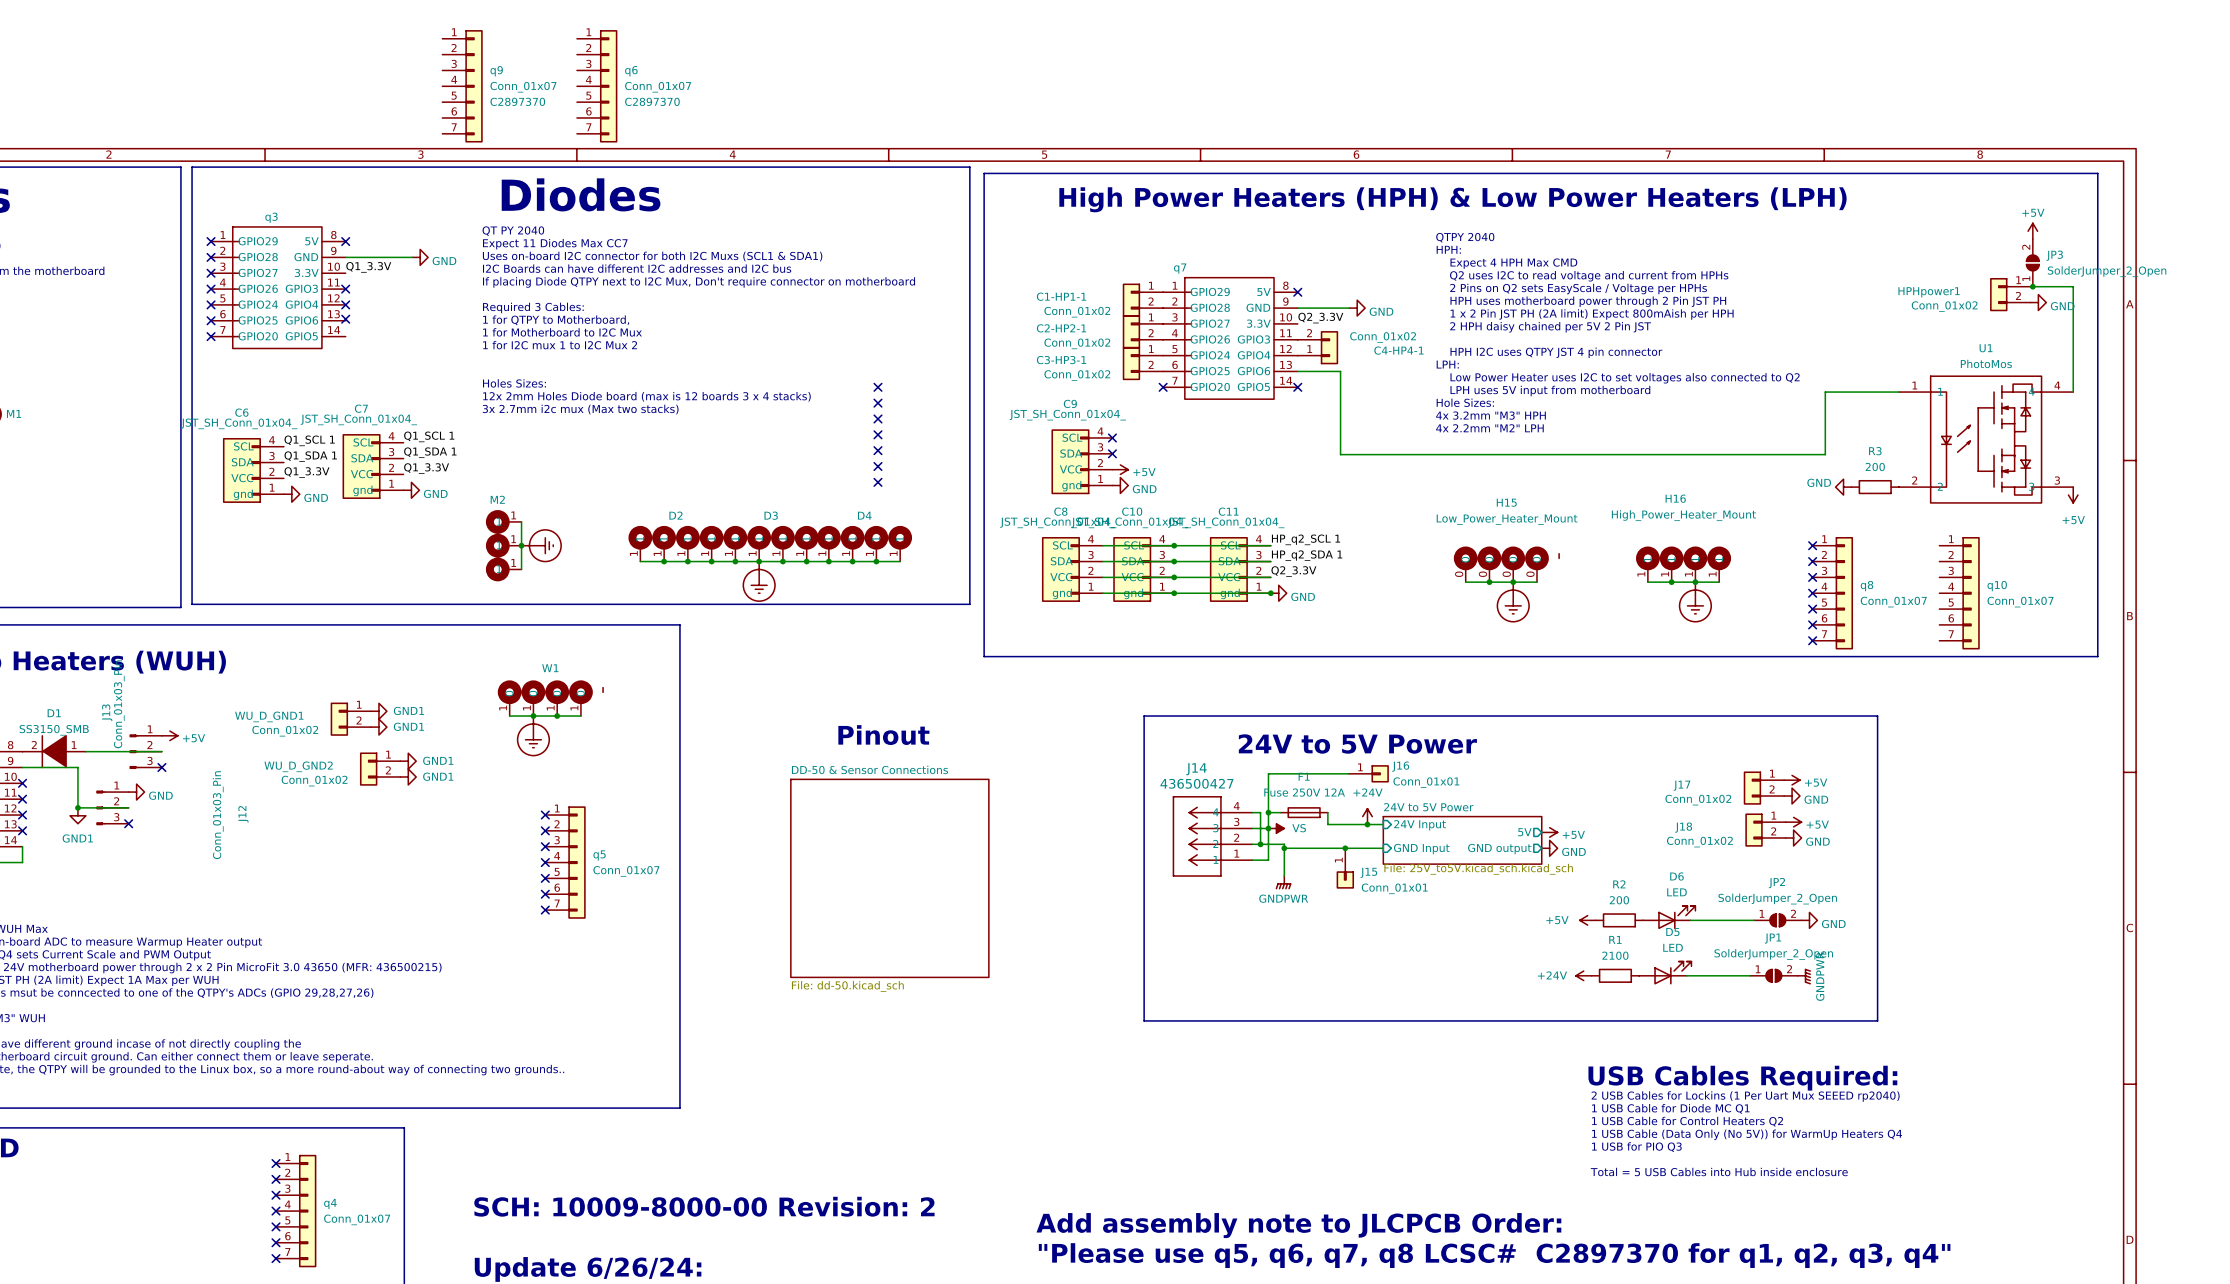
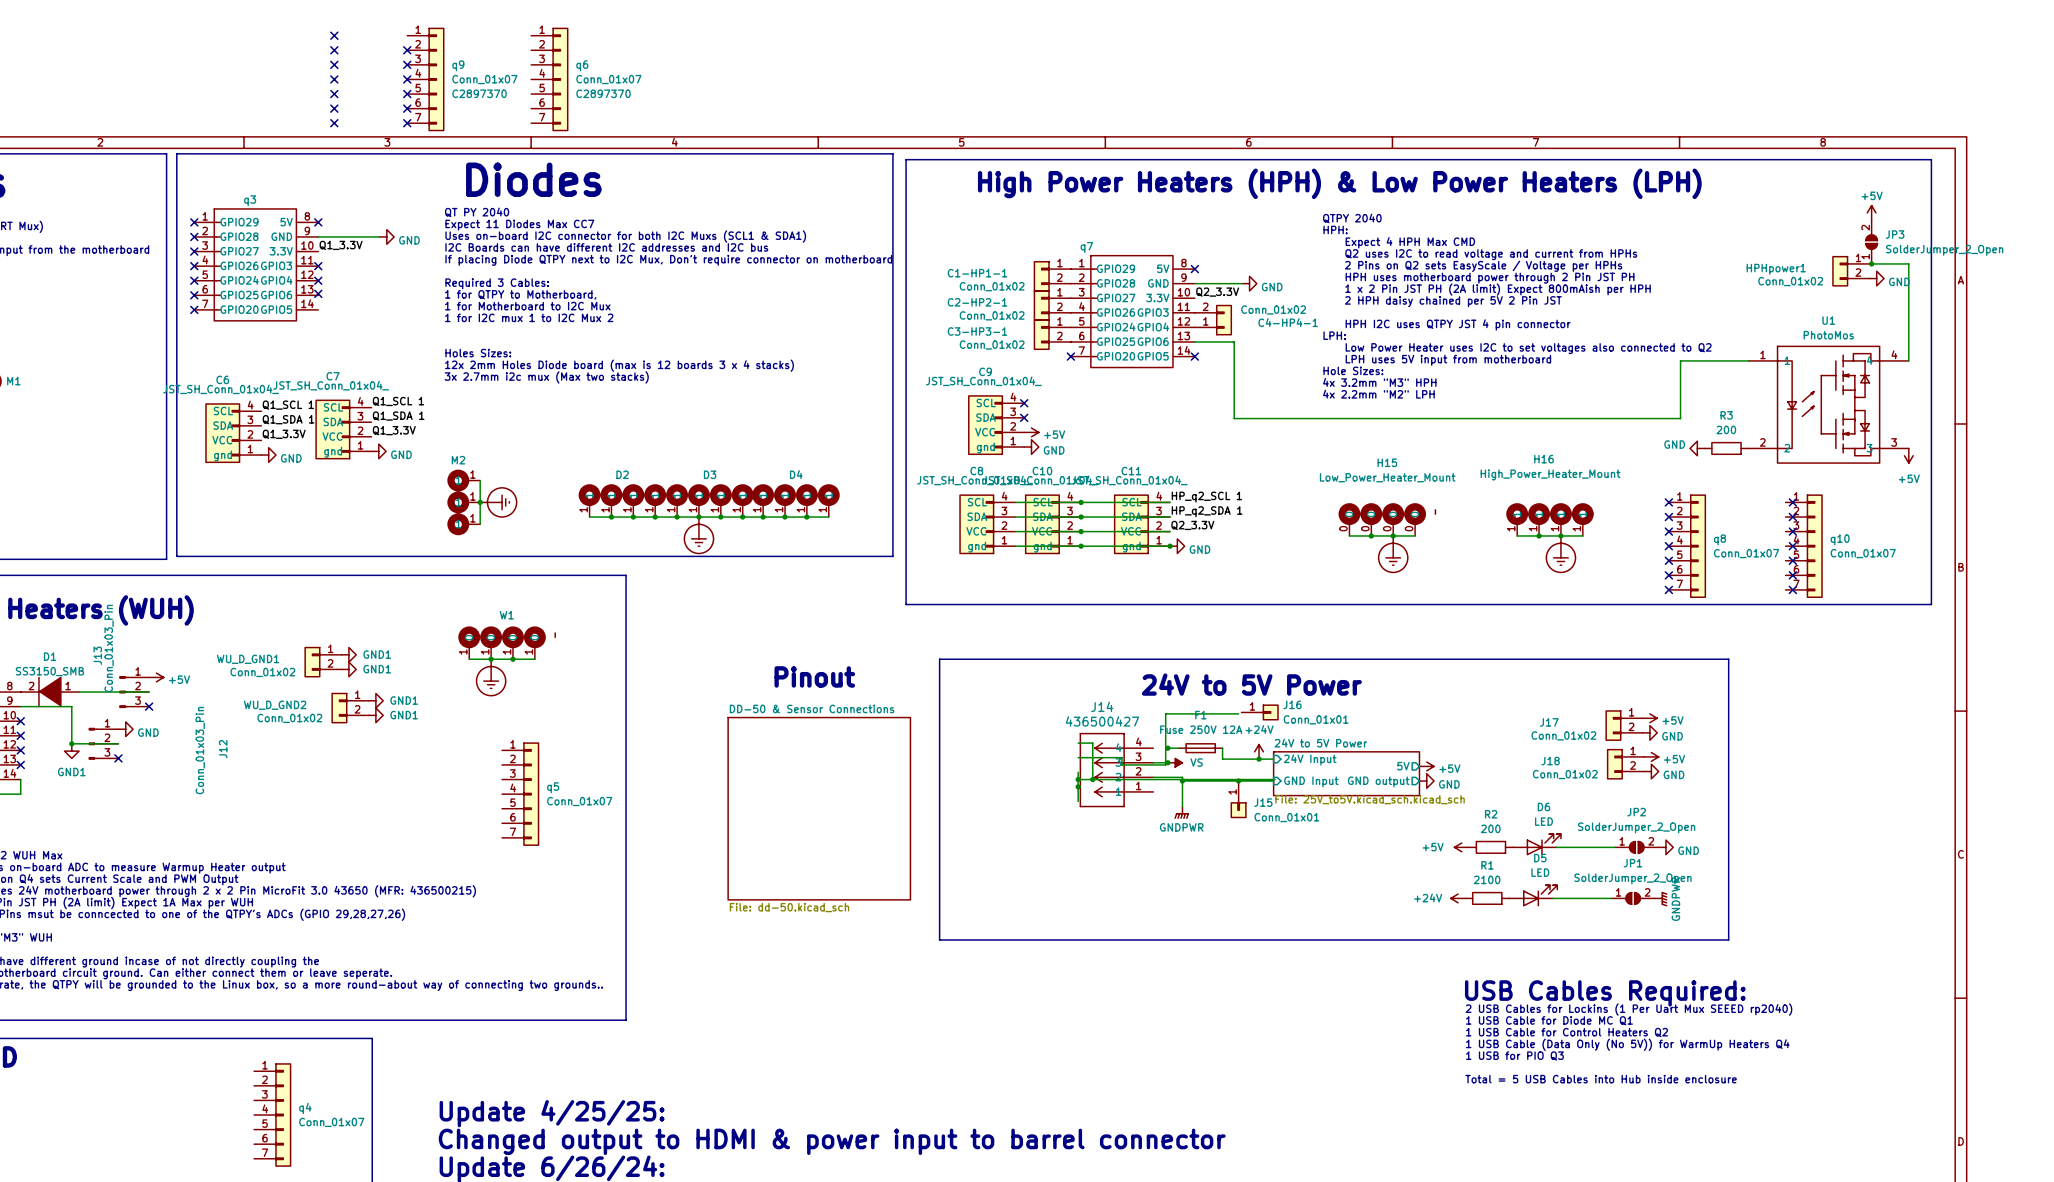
no-connect mark: none -> (334, 35)
no-connect mark: none -> (334, 50)
no-connect mark: none -> (407, 50)
no-connect mark: none -> (334, 64)
no-connect mark: none -> (407, 64)
no-connect mark: none -> (334, 79)
no-connect mark: none -> (407, 79)
no-connect mark: none -> (334, 94)
no-connect mark: none -> (407, 94)
no-connect mark: none -> (334, 108)
no-connect mark: none -> (407, 108)
no-connect mark: none -> (334, 123)
no-connect mark: none -> (407, 123)
no-connect mark: (877, 387) -> none
no-connect mark: (877, 403) -> none
no-connect mark: (877, 418) -> none
no-connect mark: (877, 434) -> none
no-connect mark: (877, 450) -> none
no-connect mark: (877, 466) -> none
no-connect mark: (877, 482) -> none
no-connect mark: none -> (1792, 502)
no-connect mark: none -> (1792, 517)
no-connect mark: none -> (1792, 531)
no-connect mark: none -> (1792, 546)
no-connect mark: none -> (1792, 560)
no-connect mark: none -> (1792, 575)
no-connect mark: none -> (1792, 589)
line: (1144, 716) (1144, 1020) -> (1053, 659) (939, 659) (939, 939) (1053, 939)
wire: (1348, 773) (1268, 773) (1268, 860) (1252, 860) -> none
wire: none -> (1238, 713) (1165, 713) (1165, 764) (1121, 764) (1121, 757) (1078, 757)
wire: none -> (1078, 743) (1092, 743) (1092, 779)
wire: (1252, 812) (1260, 812) (1260, 844) -> none
no-connect mark: (545, 815) -> none
no-connect mark: (545, 830) -> none
wire: none -> (1078, 772) (1078, 801)
junction: (1260, 844) -> none
no-connect mark: (545, 846) -> none
wire: none -> (1078, 779) (1275, 779)
junction: none -> (1078, 779)
junction: none -> (1092, 779)
junction: none -> (1078, 786)
no-connect mark: (545, 862) -> none
no-connect mark: (545, 878) -> none
no-connect mark: (545, 894) -> none
no-connect mark: (545, 910) -> none
no-connect mark: (276, 1163) -> none
no-connect mark: (276, 1179) -> none
no-connect mark: (276, 1195) -> none
text: SCH: 10009-8000-00 Revision: 2 (704, 1206) -> Update 4/25/25: (552, 1113)
no-connect mark: (276, 1211) -> none
text: Add assembly note to JLCPCB Order: (1298, 1225) -> none
no-connect mark: (276, 1226) -> none
text: none -> Changed output to HDMI & power input to barrel connector (832, 1141)
no-connect mark: (276, 1242) -> none
text: "Please use q5, q6, q7, q8 LCSC# C2897370 for q1, q2, q3, q4" (1494, 1255) -> none
no-connect mark: (276, 1258) -> none

